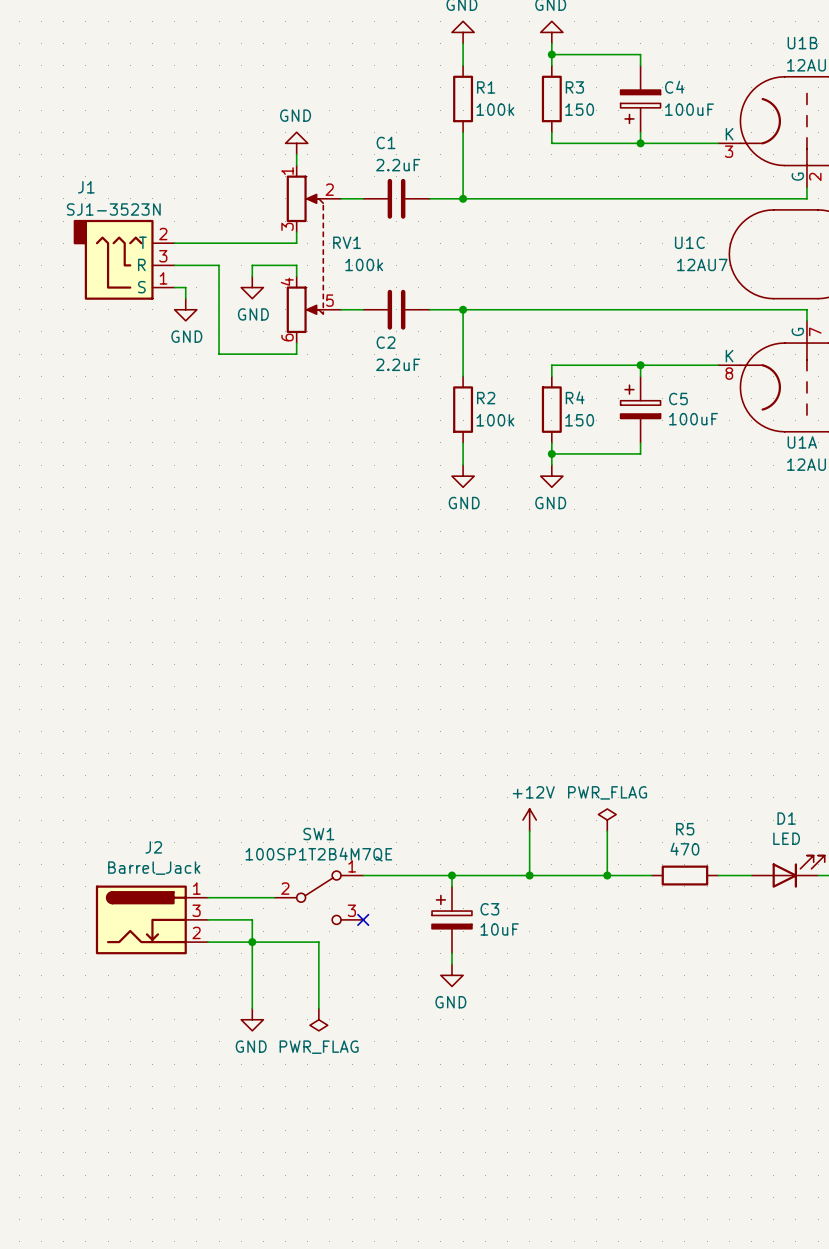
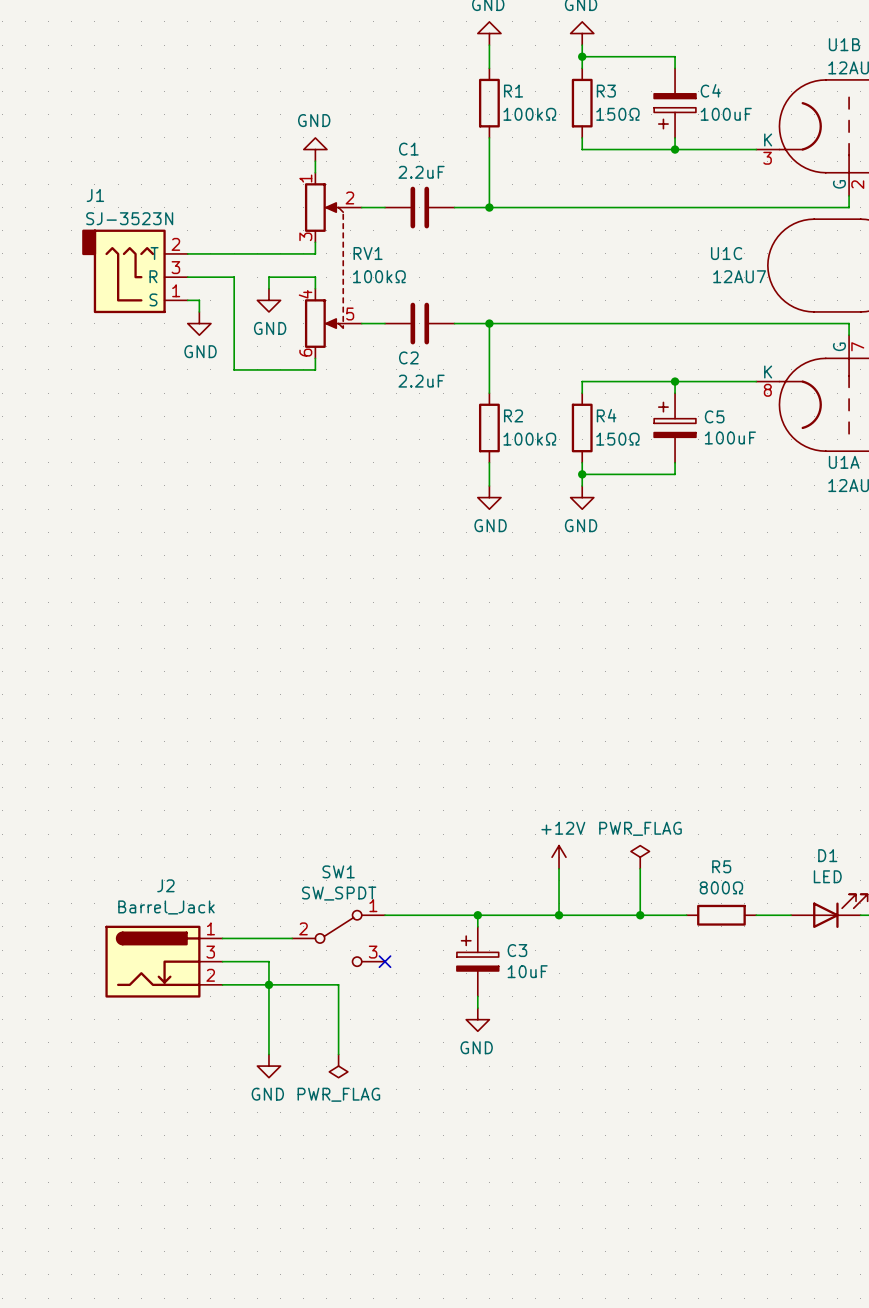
R1 value: 100k (495, 109) -> 100kΩ (529, 114)
R3 value: 150 (579, 109) -> 150Ω (617, 114)
J1 value: SJ1-3523N (113, 209) -> SJ-3523N (129, 218)
RV1 value: 100k (364, 264) -> 100kΩ (379, 276)
R2 value: 100k (495, 420) -> 100kΩ (529, 439)
R4 value: 150 (579, 420) -> 150Ω (617, 439)
R5 value: 470 (684, 849) -> 800Ω (721, 887)
SW1 value: 100SP1T2B4M7QE (318, 854) -> SW_SPDT (339, 893)

